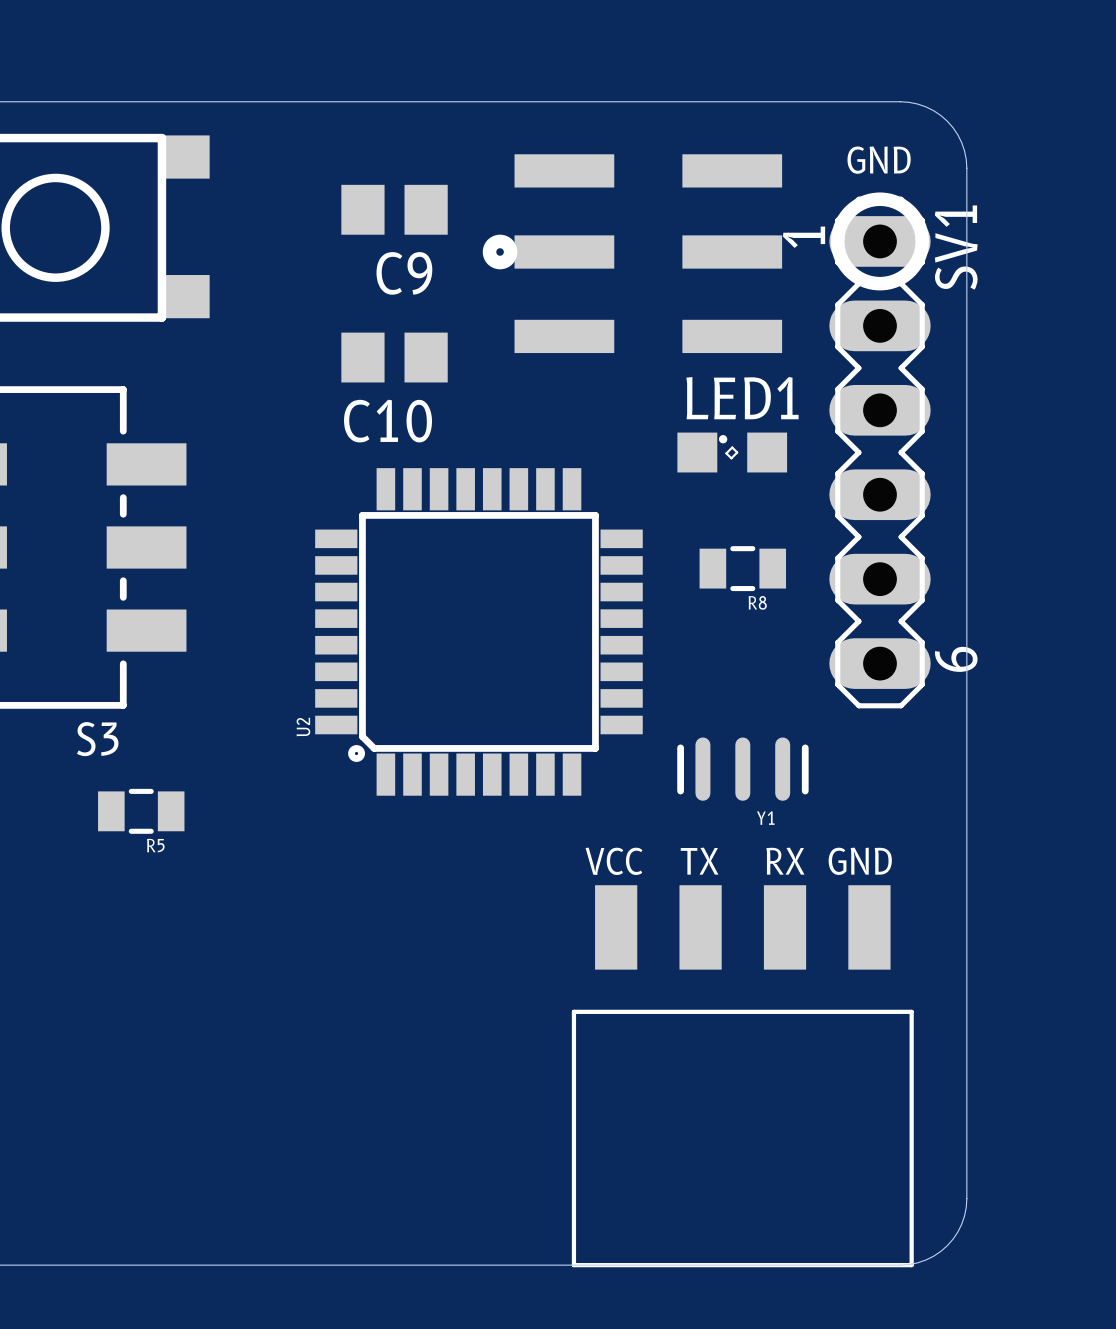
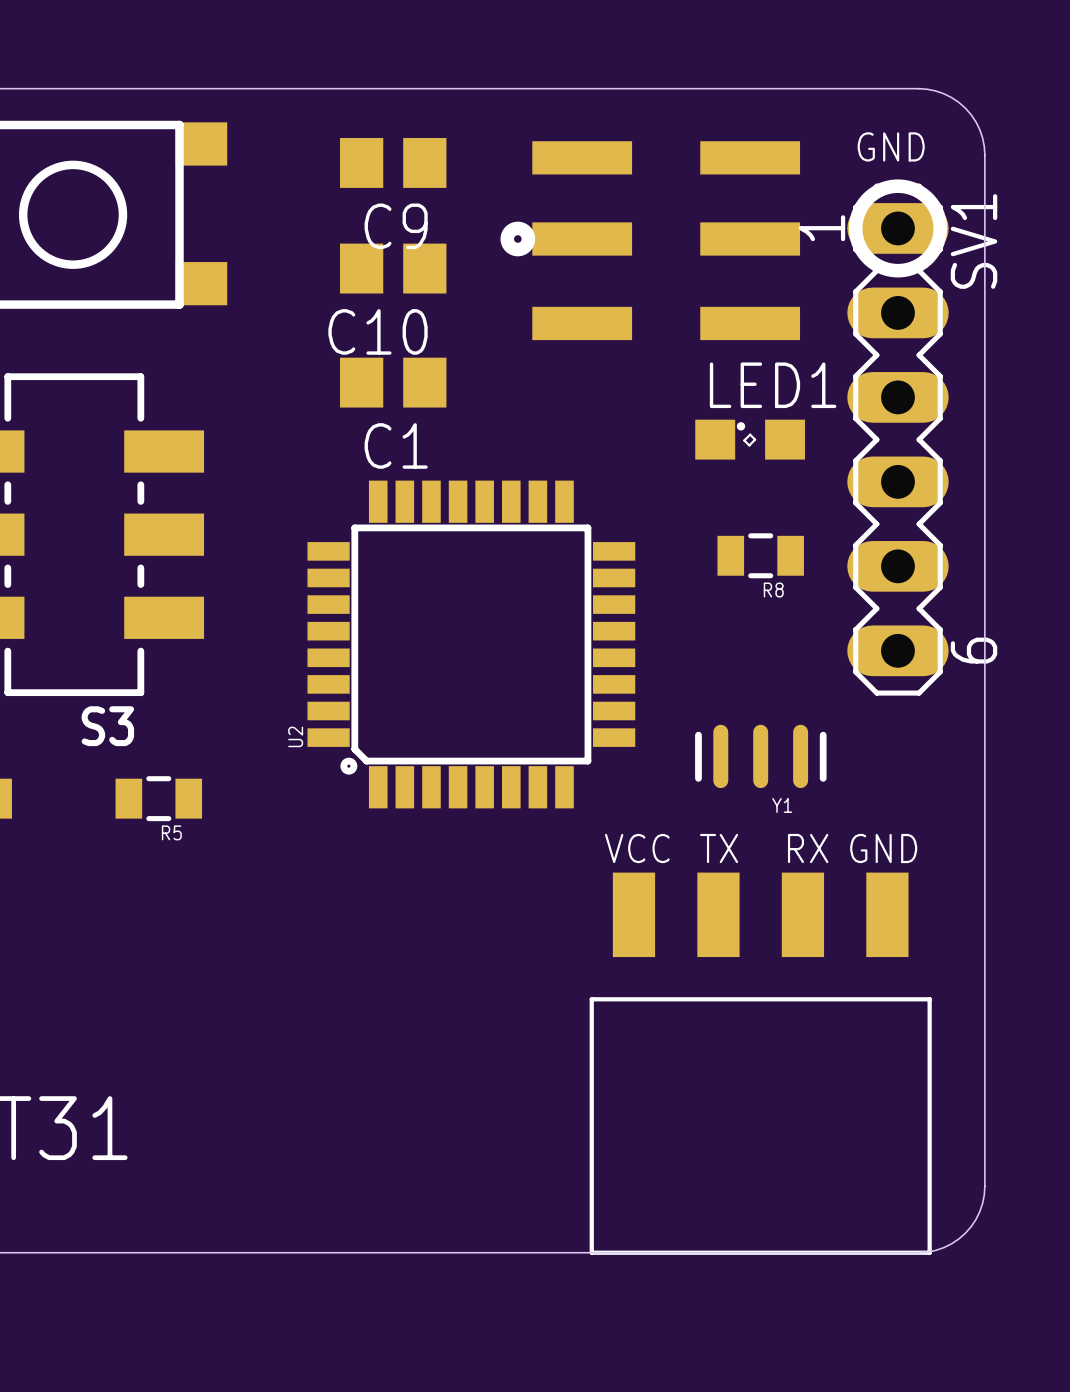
C9 position: (394, 209) -> (393, 162)
C10 position: (394, 357) -> (393, 268)
C1: none -> (393, 382)
U2 position: (478, 631) -> (471, 644)

